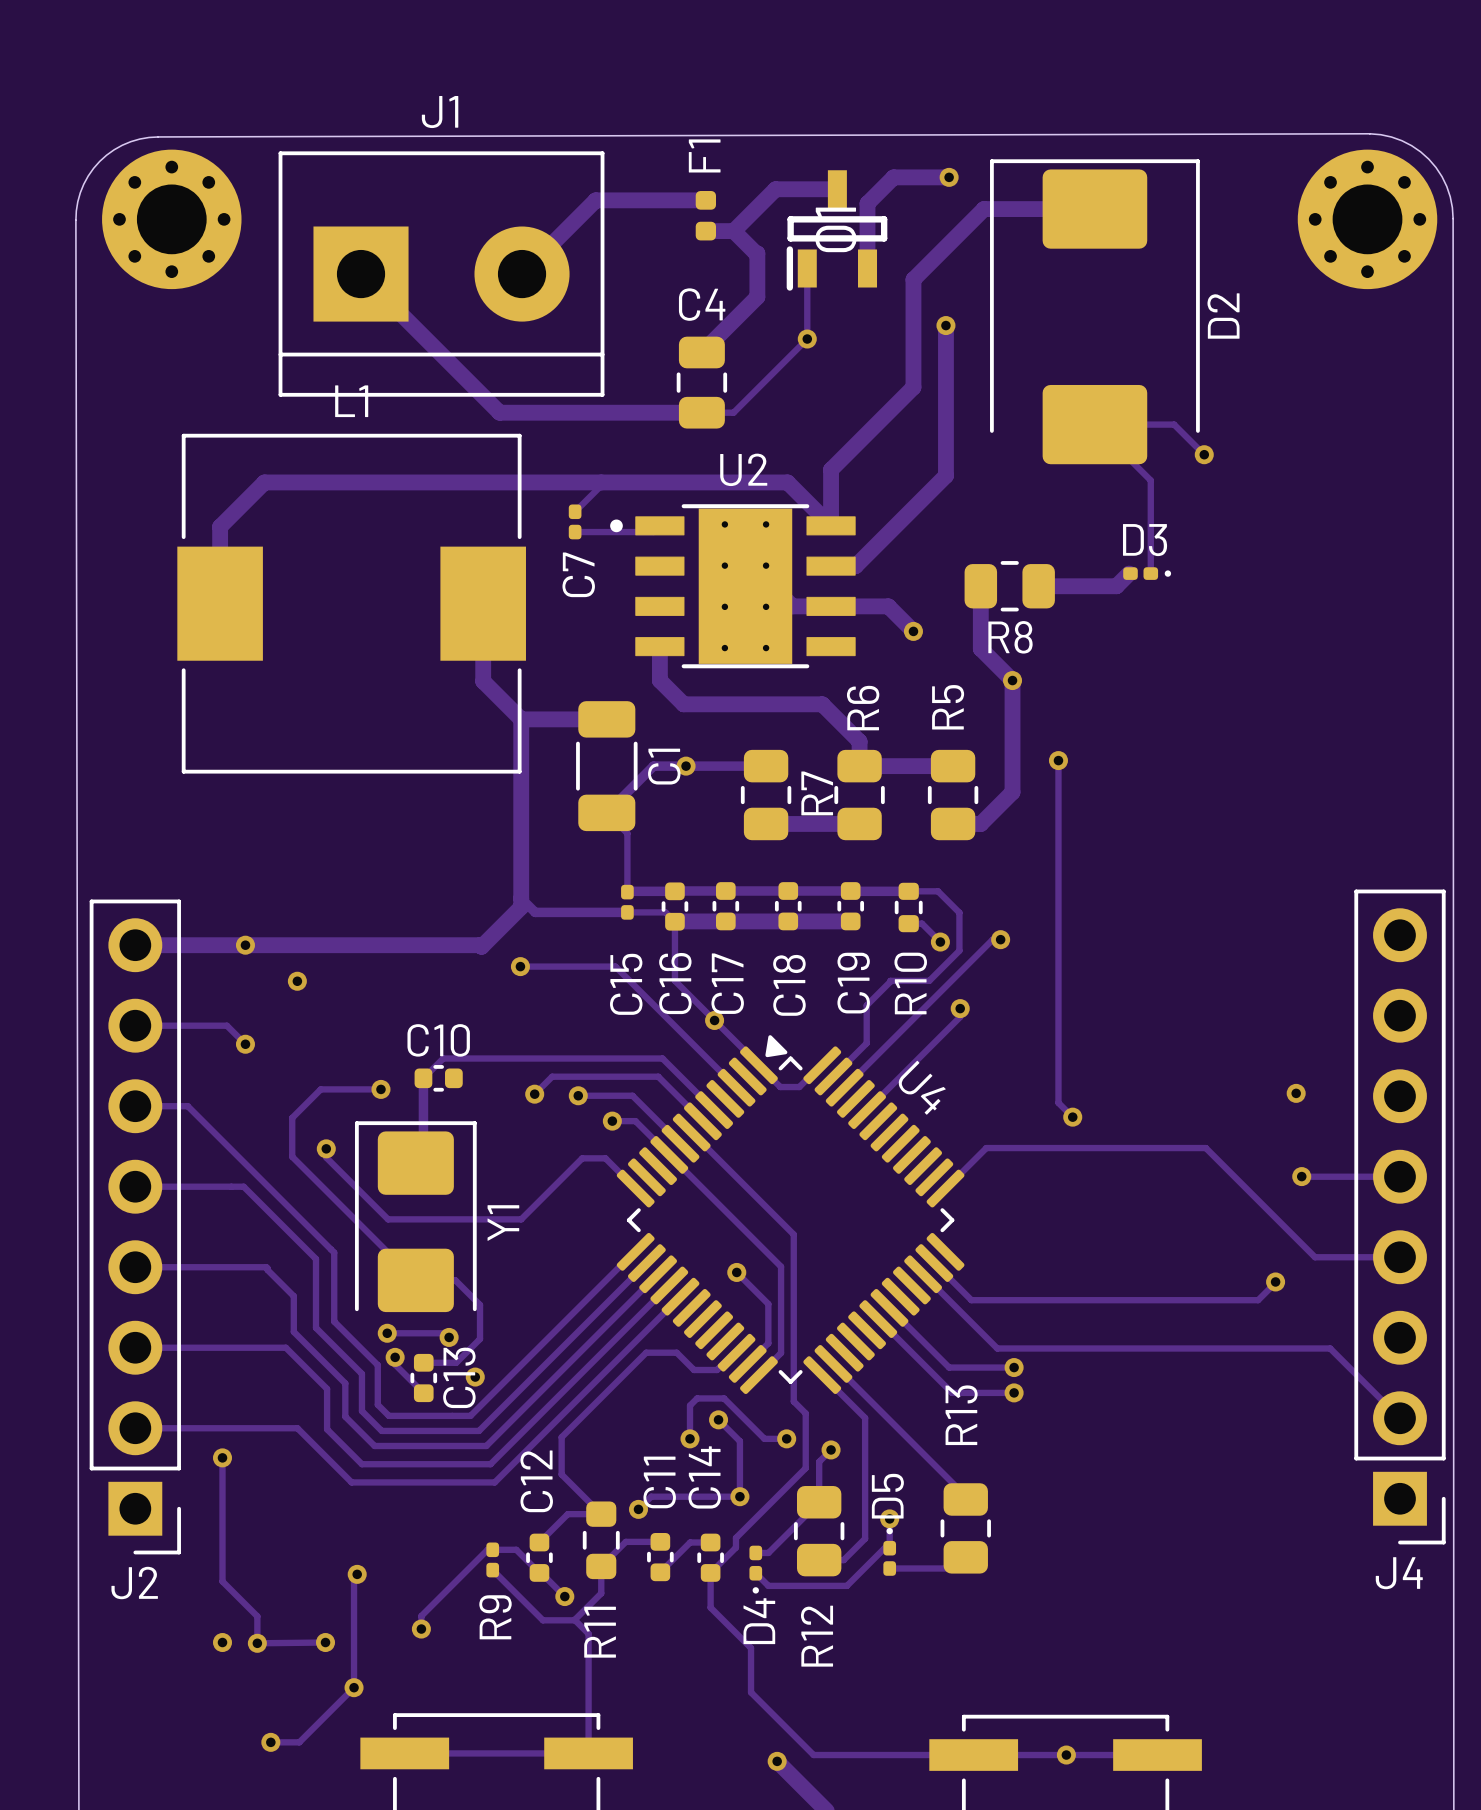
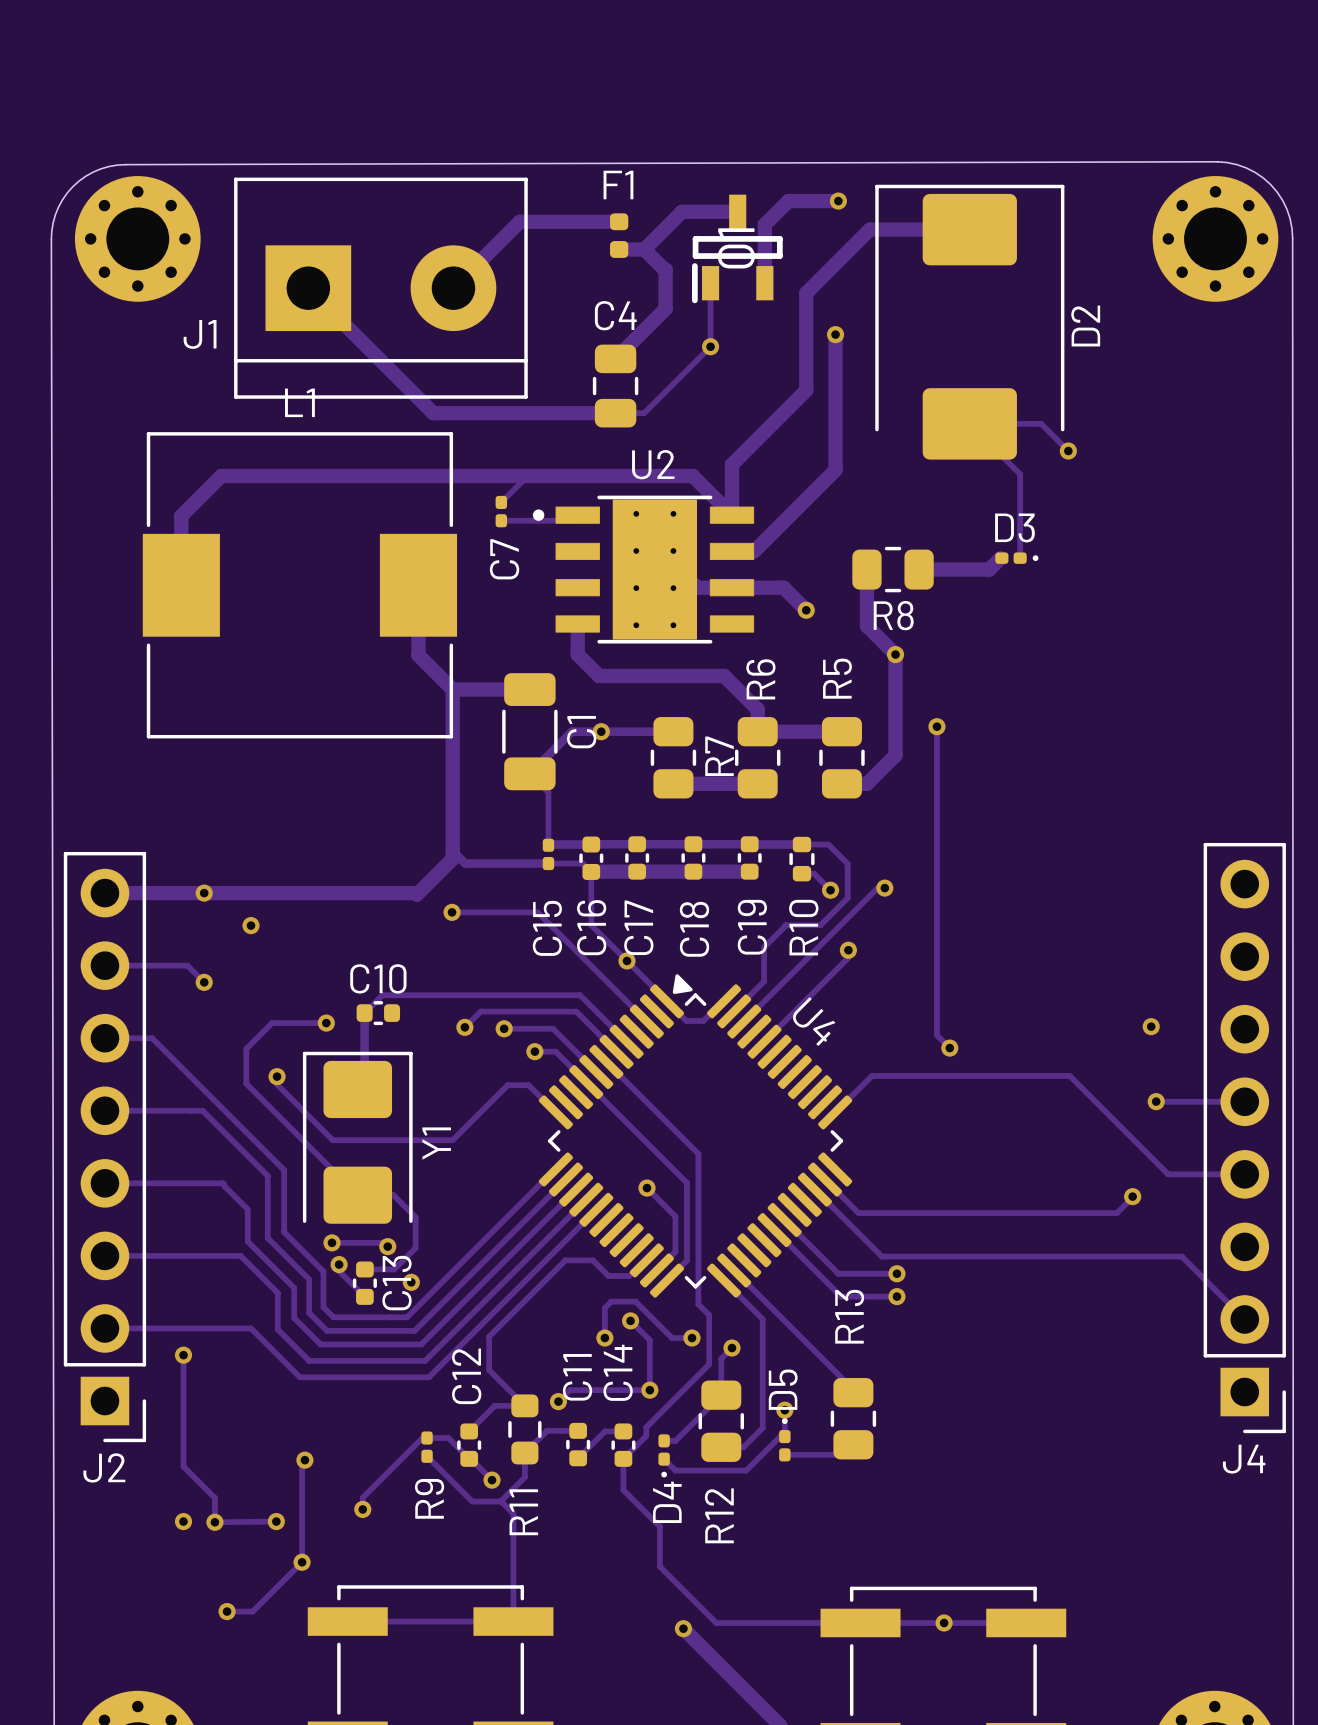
J1 name position: J1 (440, 112) -> J1 (200, 334)
F1 name rotation: 0° (704, 155) -> 90° clockwise (618, 185)

